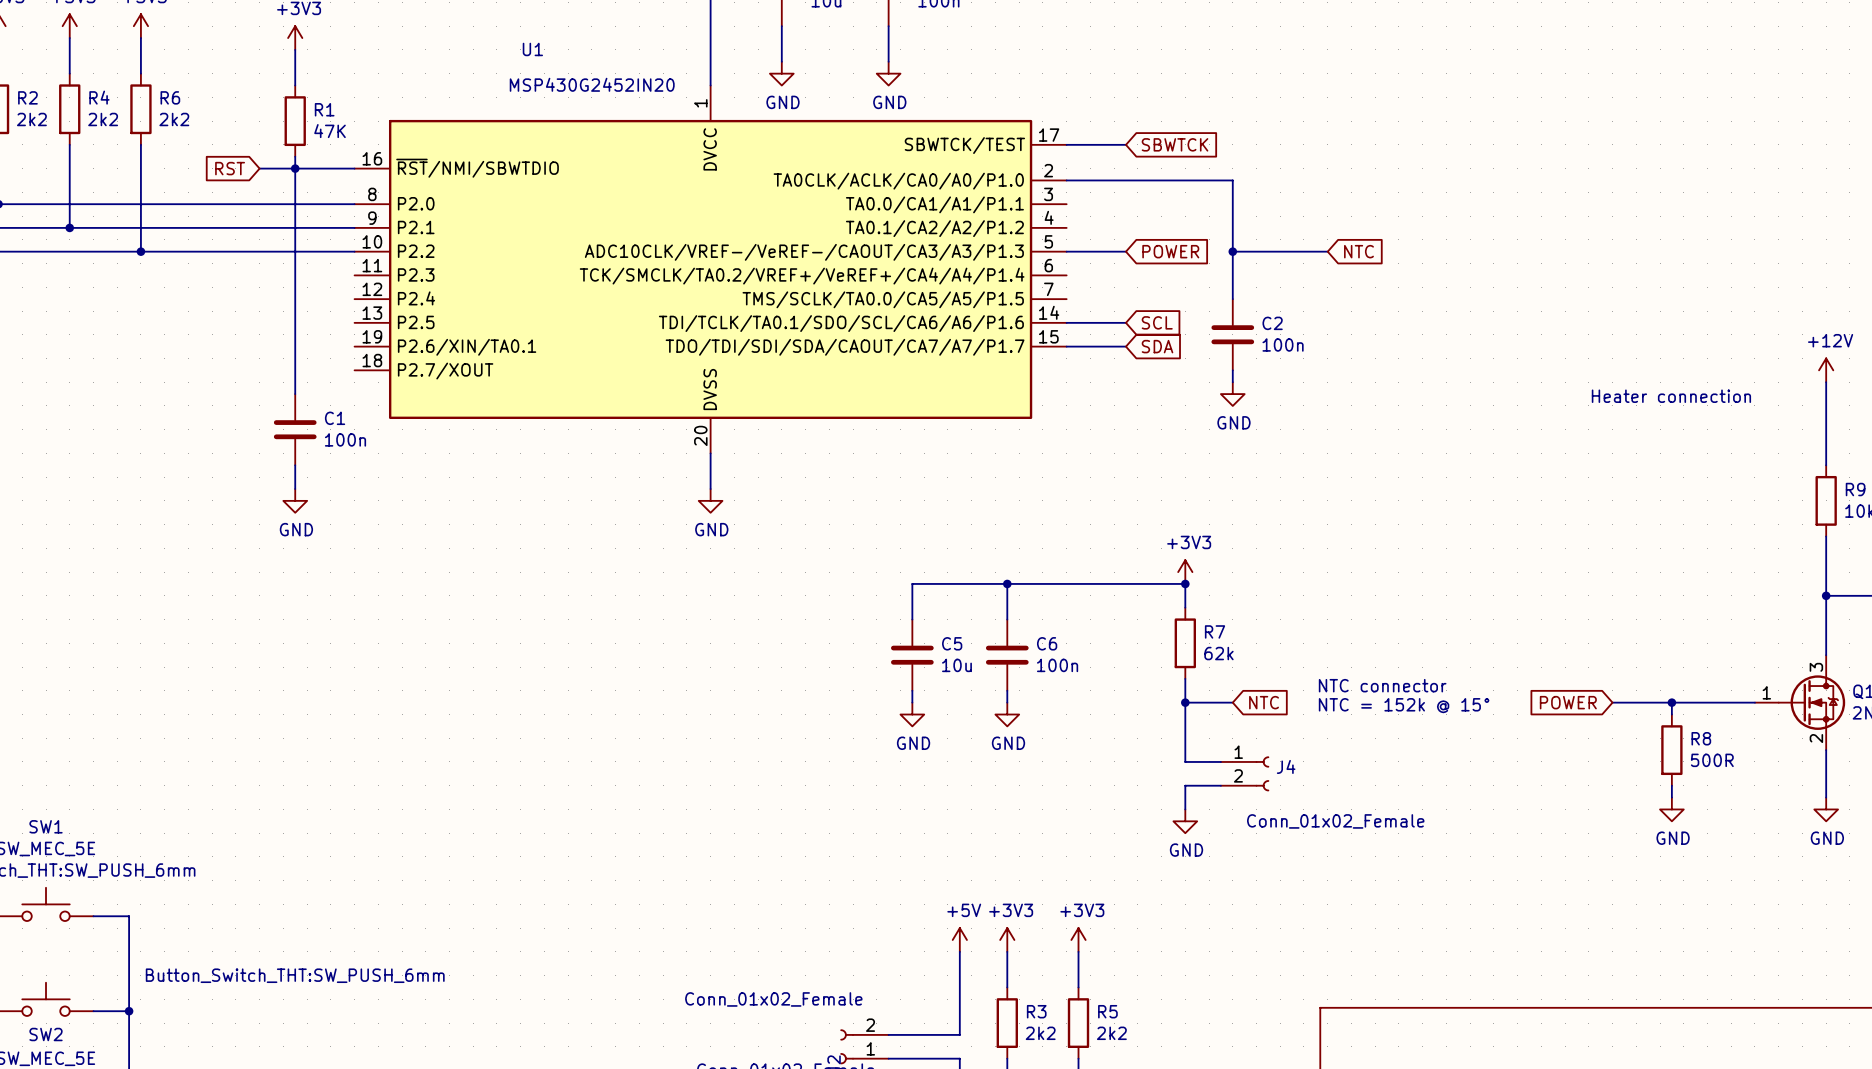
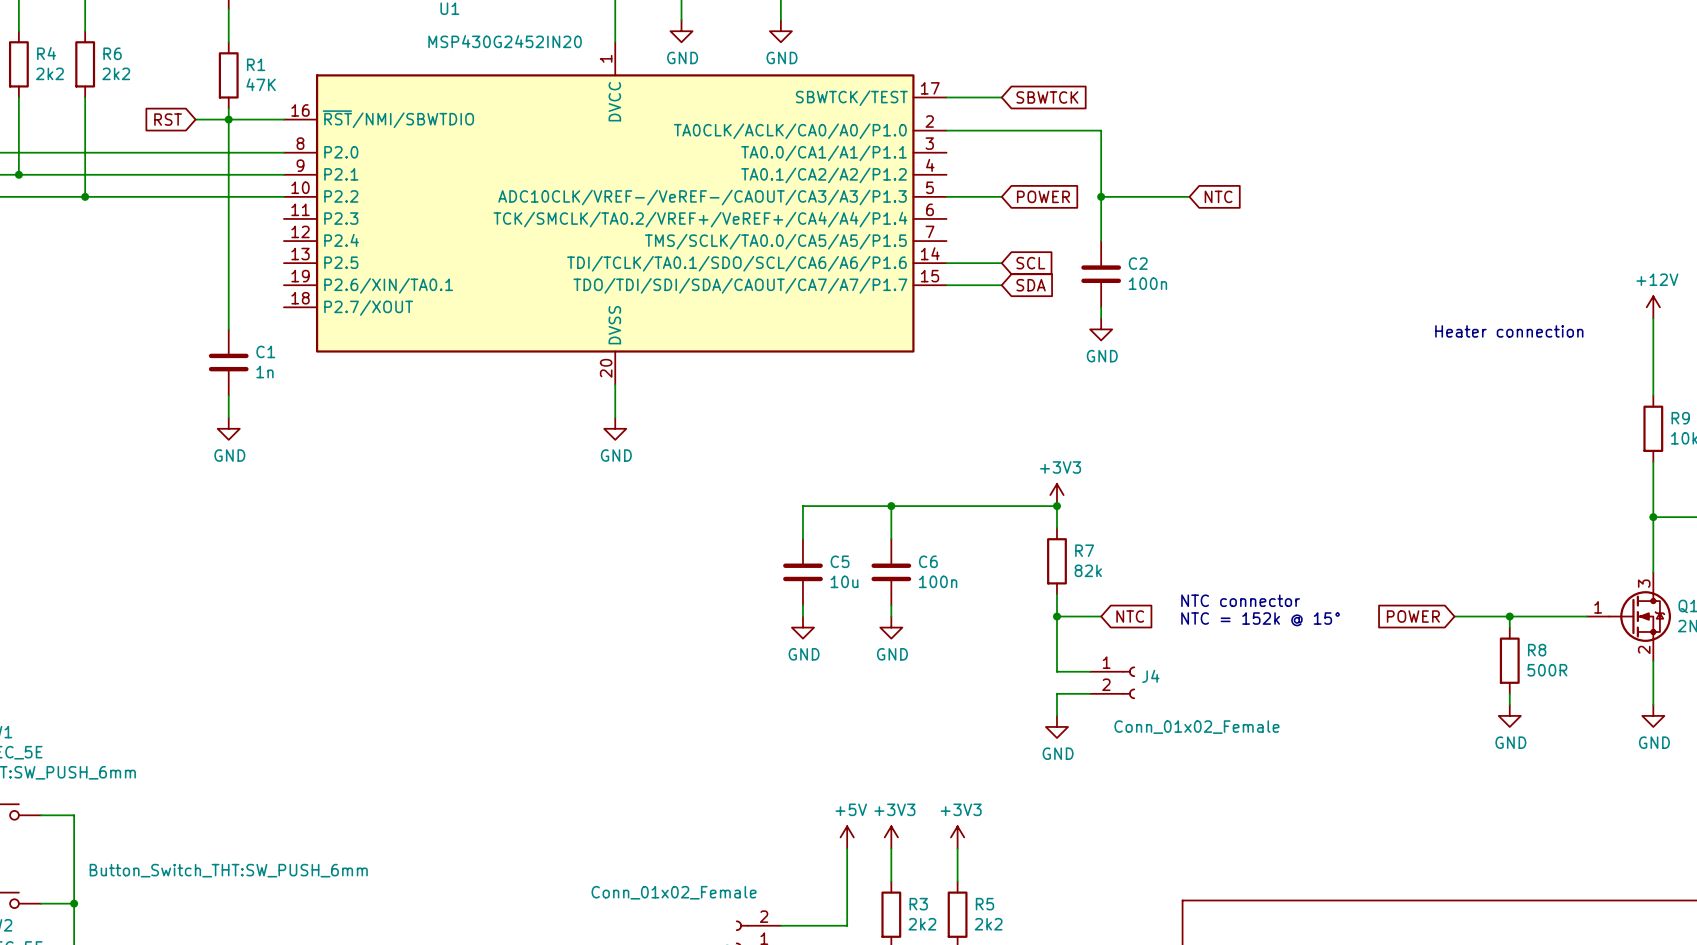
C1 value: 100n (345, 439) -> 1n (264, 372)
R7 value: 62k (1218, 653) -> 82k (1088, 570)

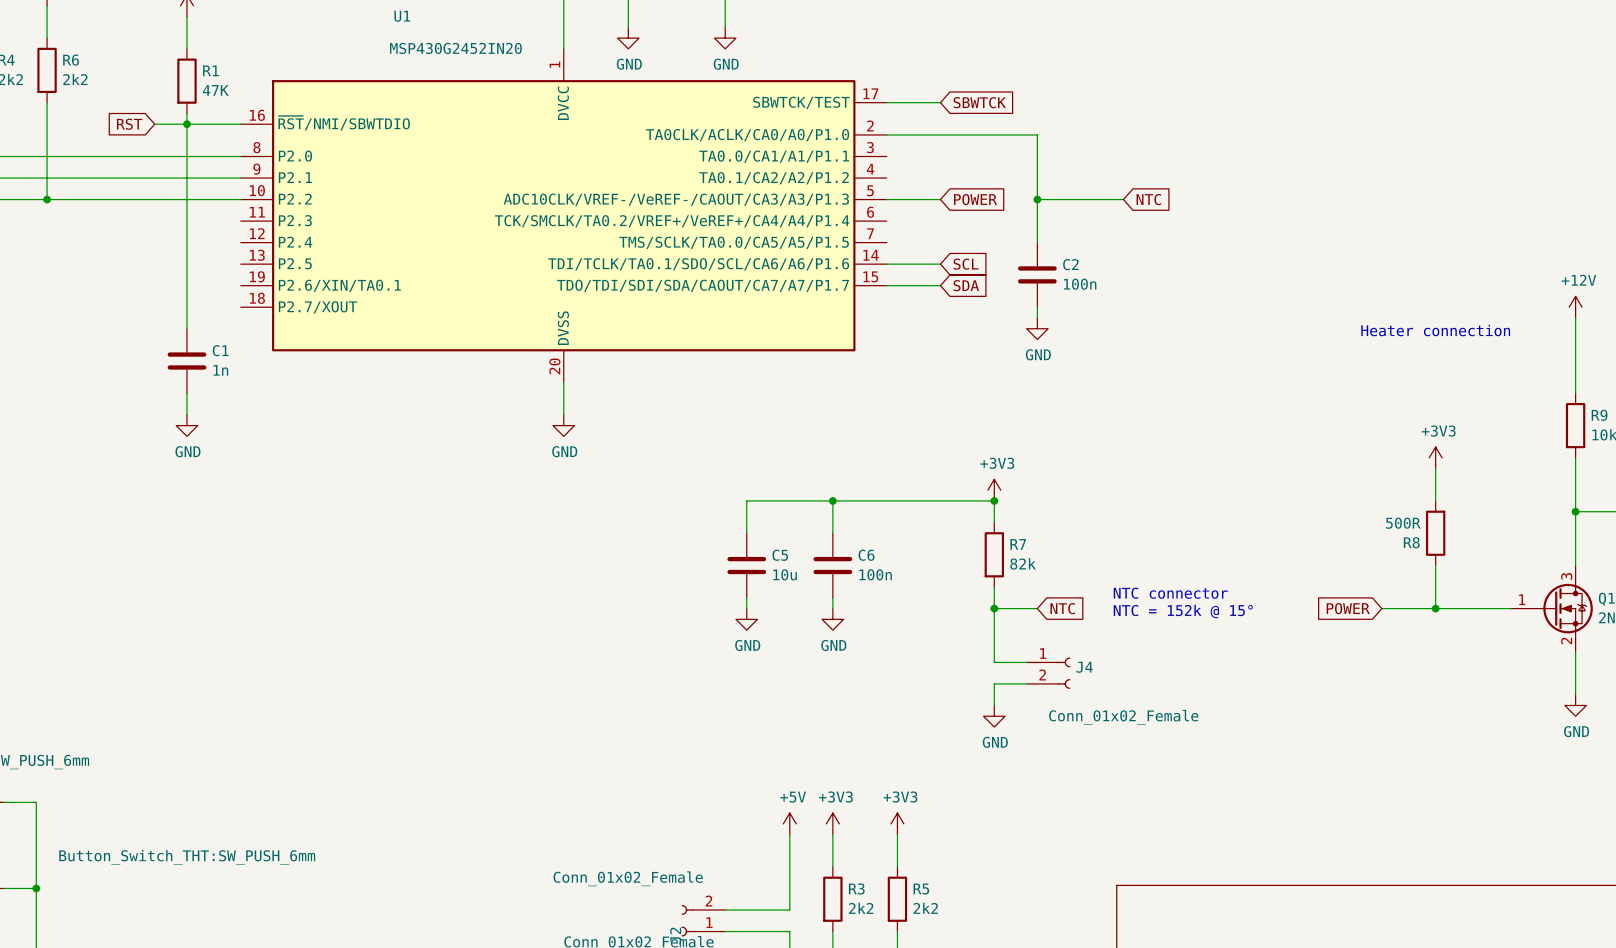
power symbol: none -> +3V3 (1435, 457)
wire: none -> (1435, 468) (1435, 500)
wire: (1509, 616) (1509, 627) -> (1435, 608) (1435, 565)
R8 name position: R8 (1537, 650) -> R8 (1411, 542)
R8 position: (1509, 660) -> (1435, 533)
R8 value position: 500R (1547, 670) -> 500R (1403, 523)
wire: (1509, 693) (1509, 704) -> none
power symbol: GND (1509, 715) -> none

